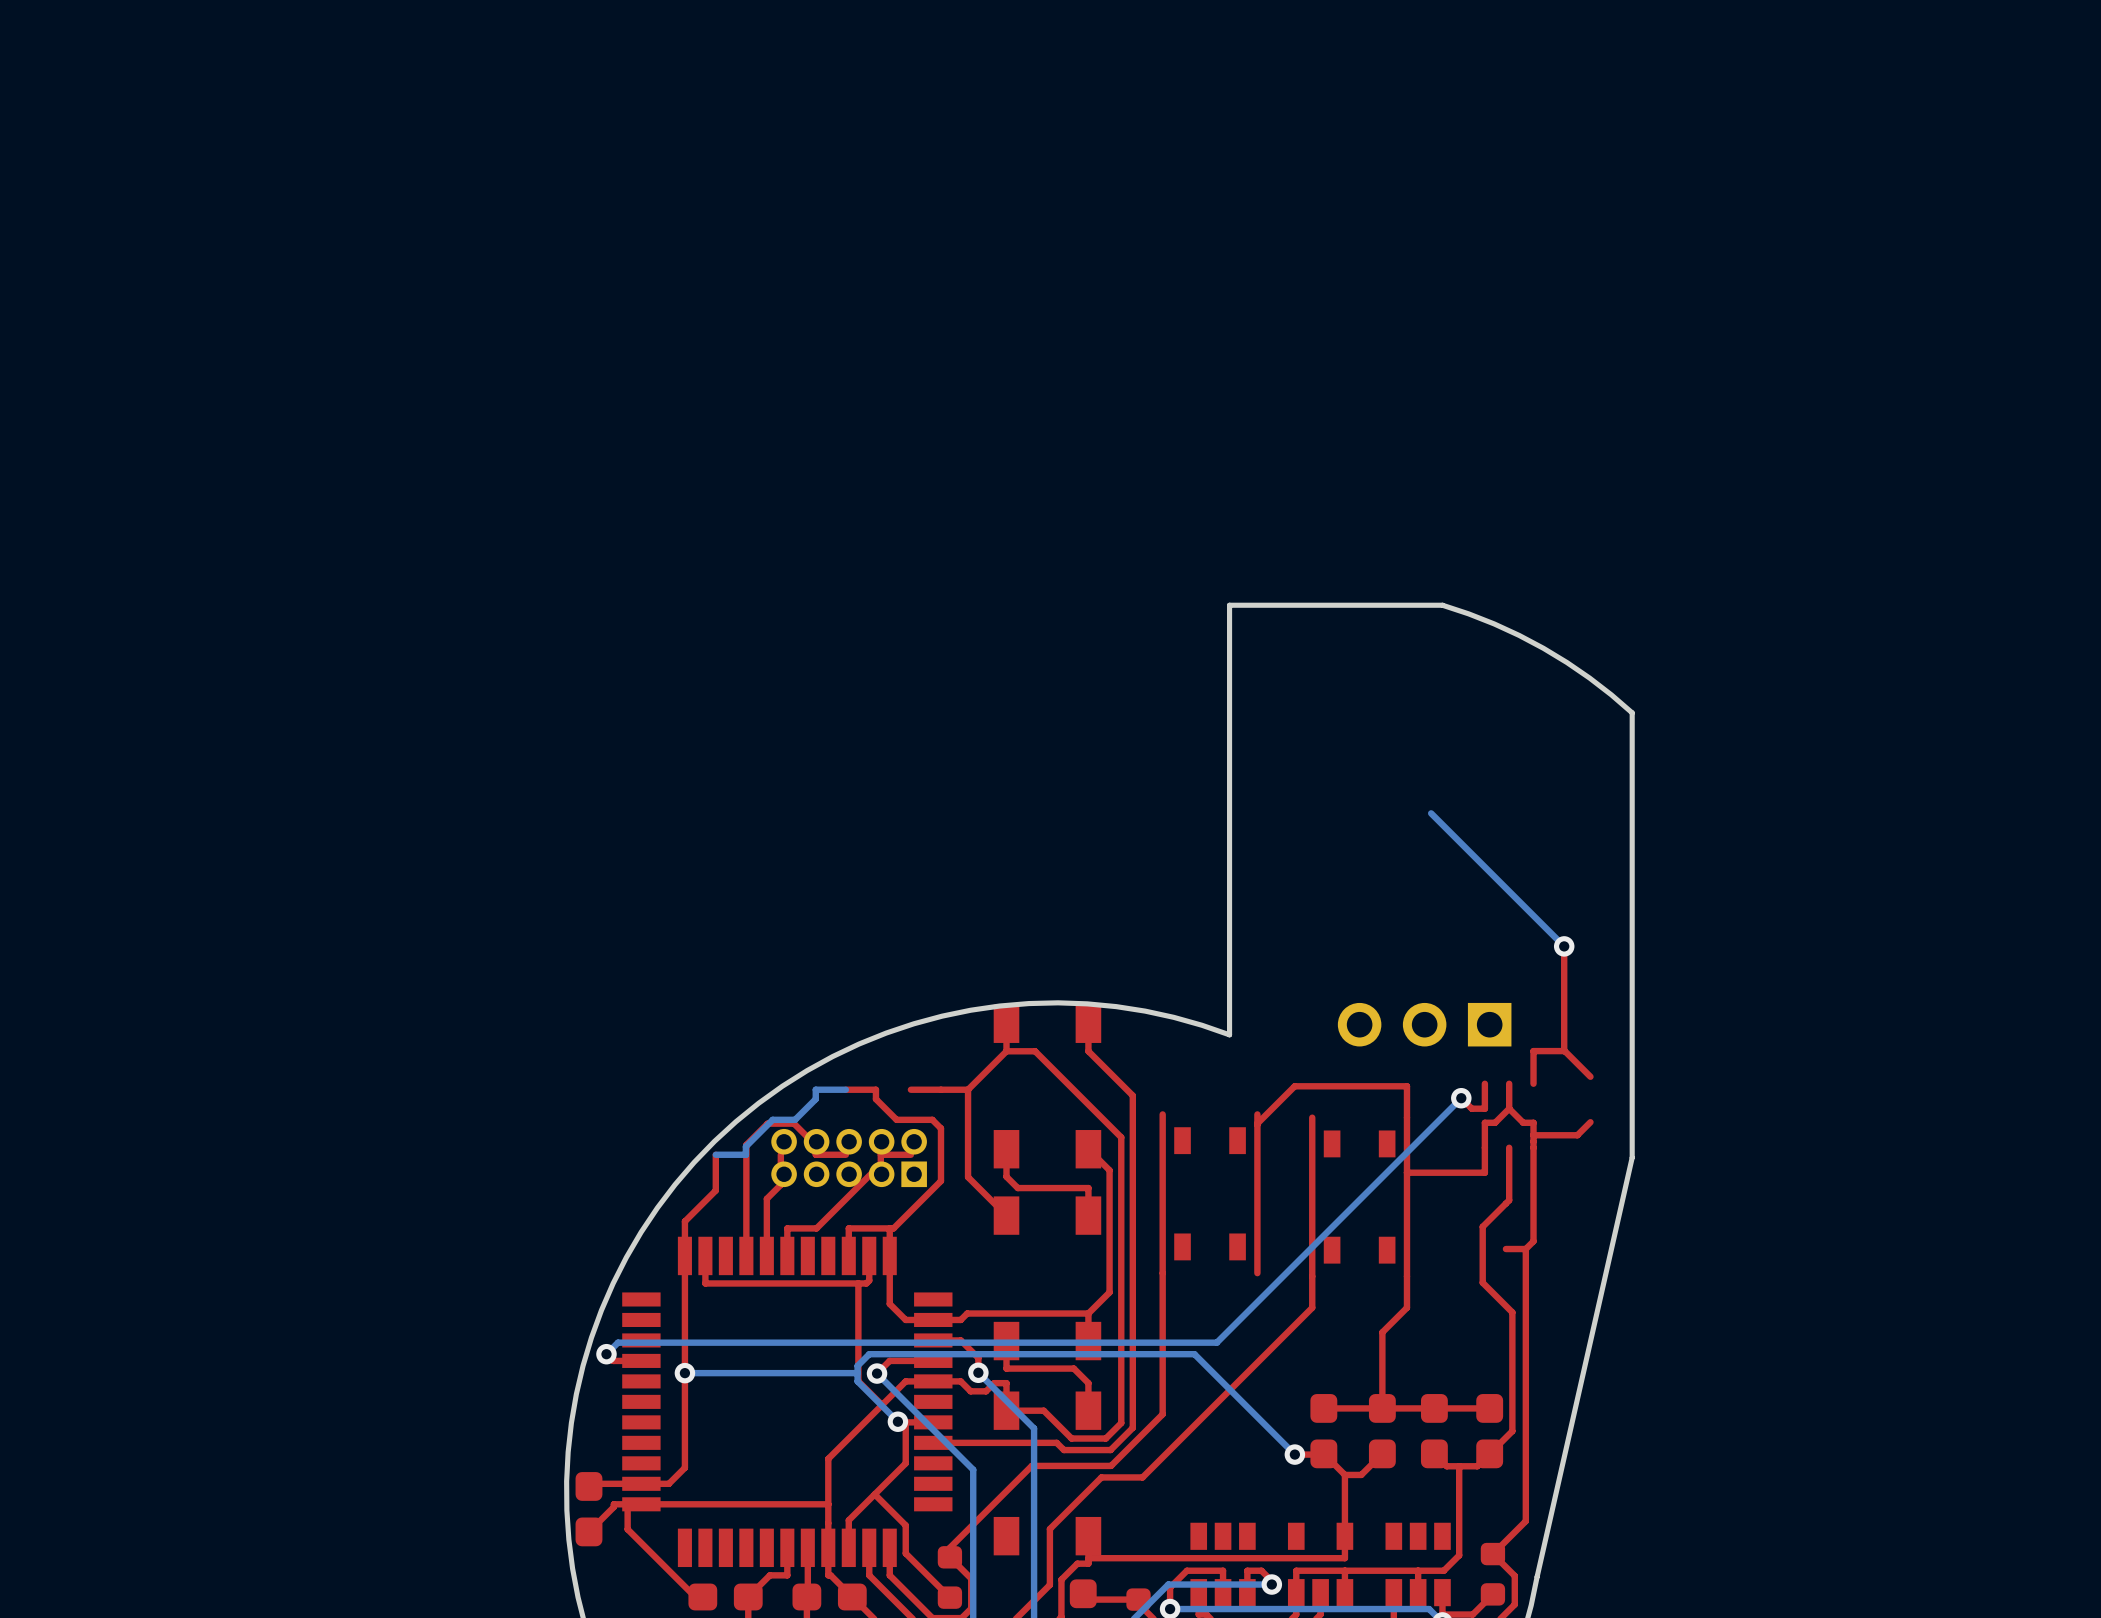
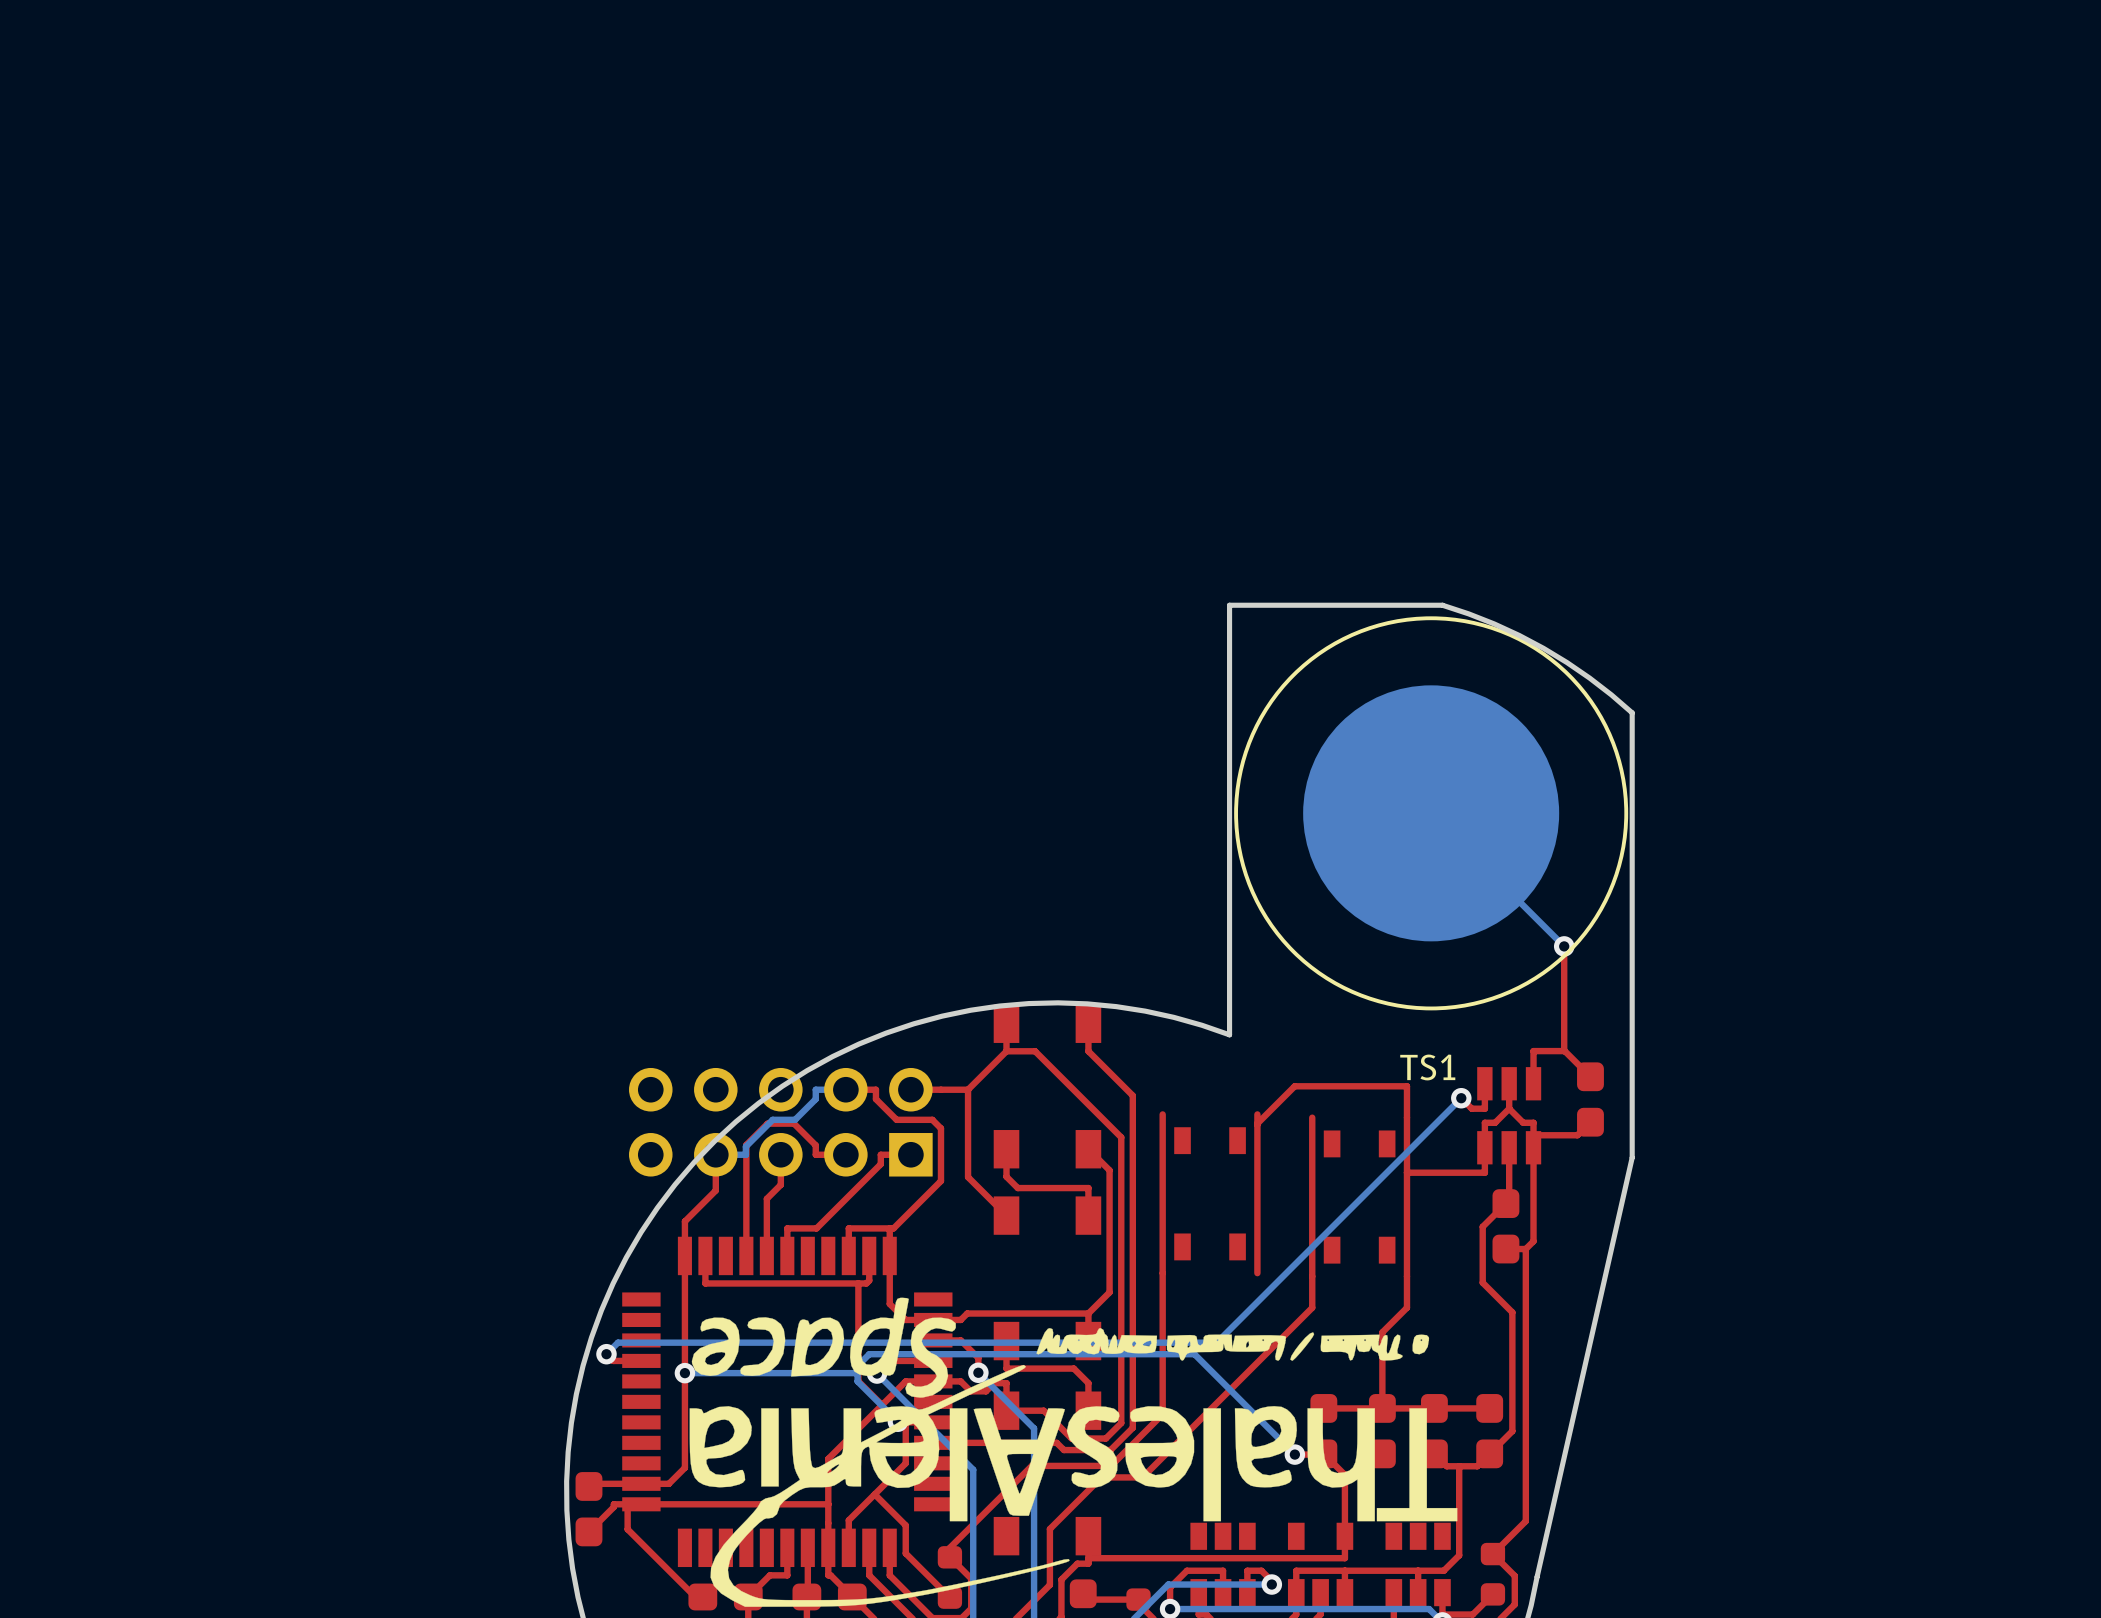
TS1: none -> (1431, 813)
part: (1424, 1024) -> none
part: none -> (1590, 1099)
part: none -> (1509, 1115)
part: none -> (780, 1122)
part: (849, 1158) -> none
part: none -> (1505, 1226)
drawing: none -> [689, 1297, 1458, 1607]

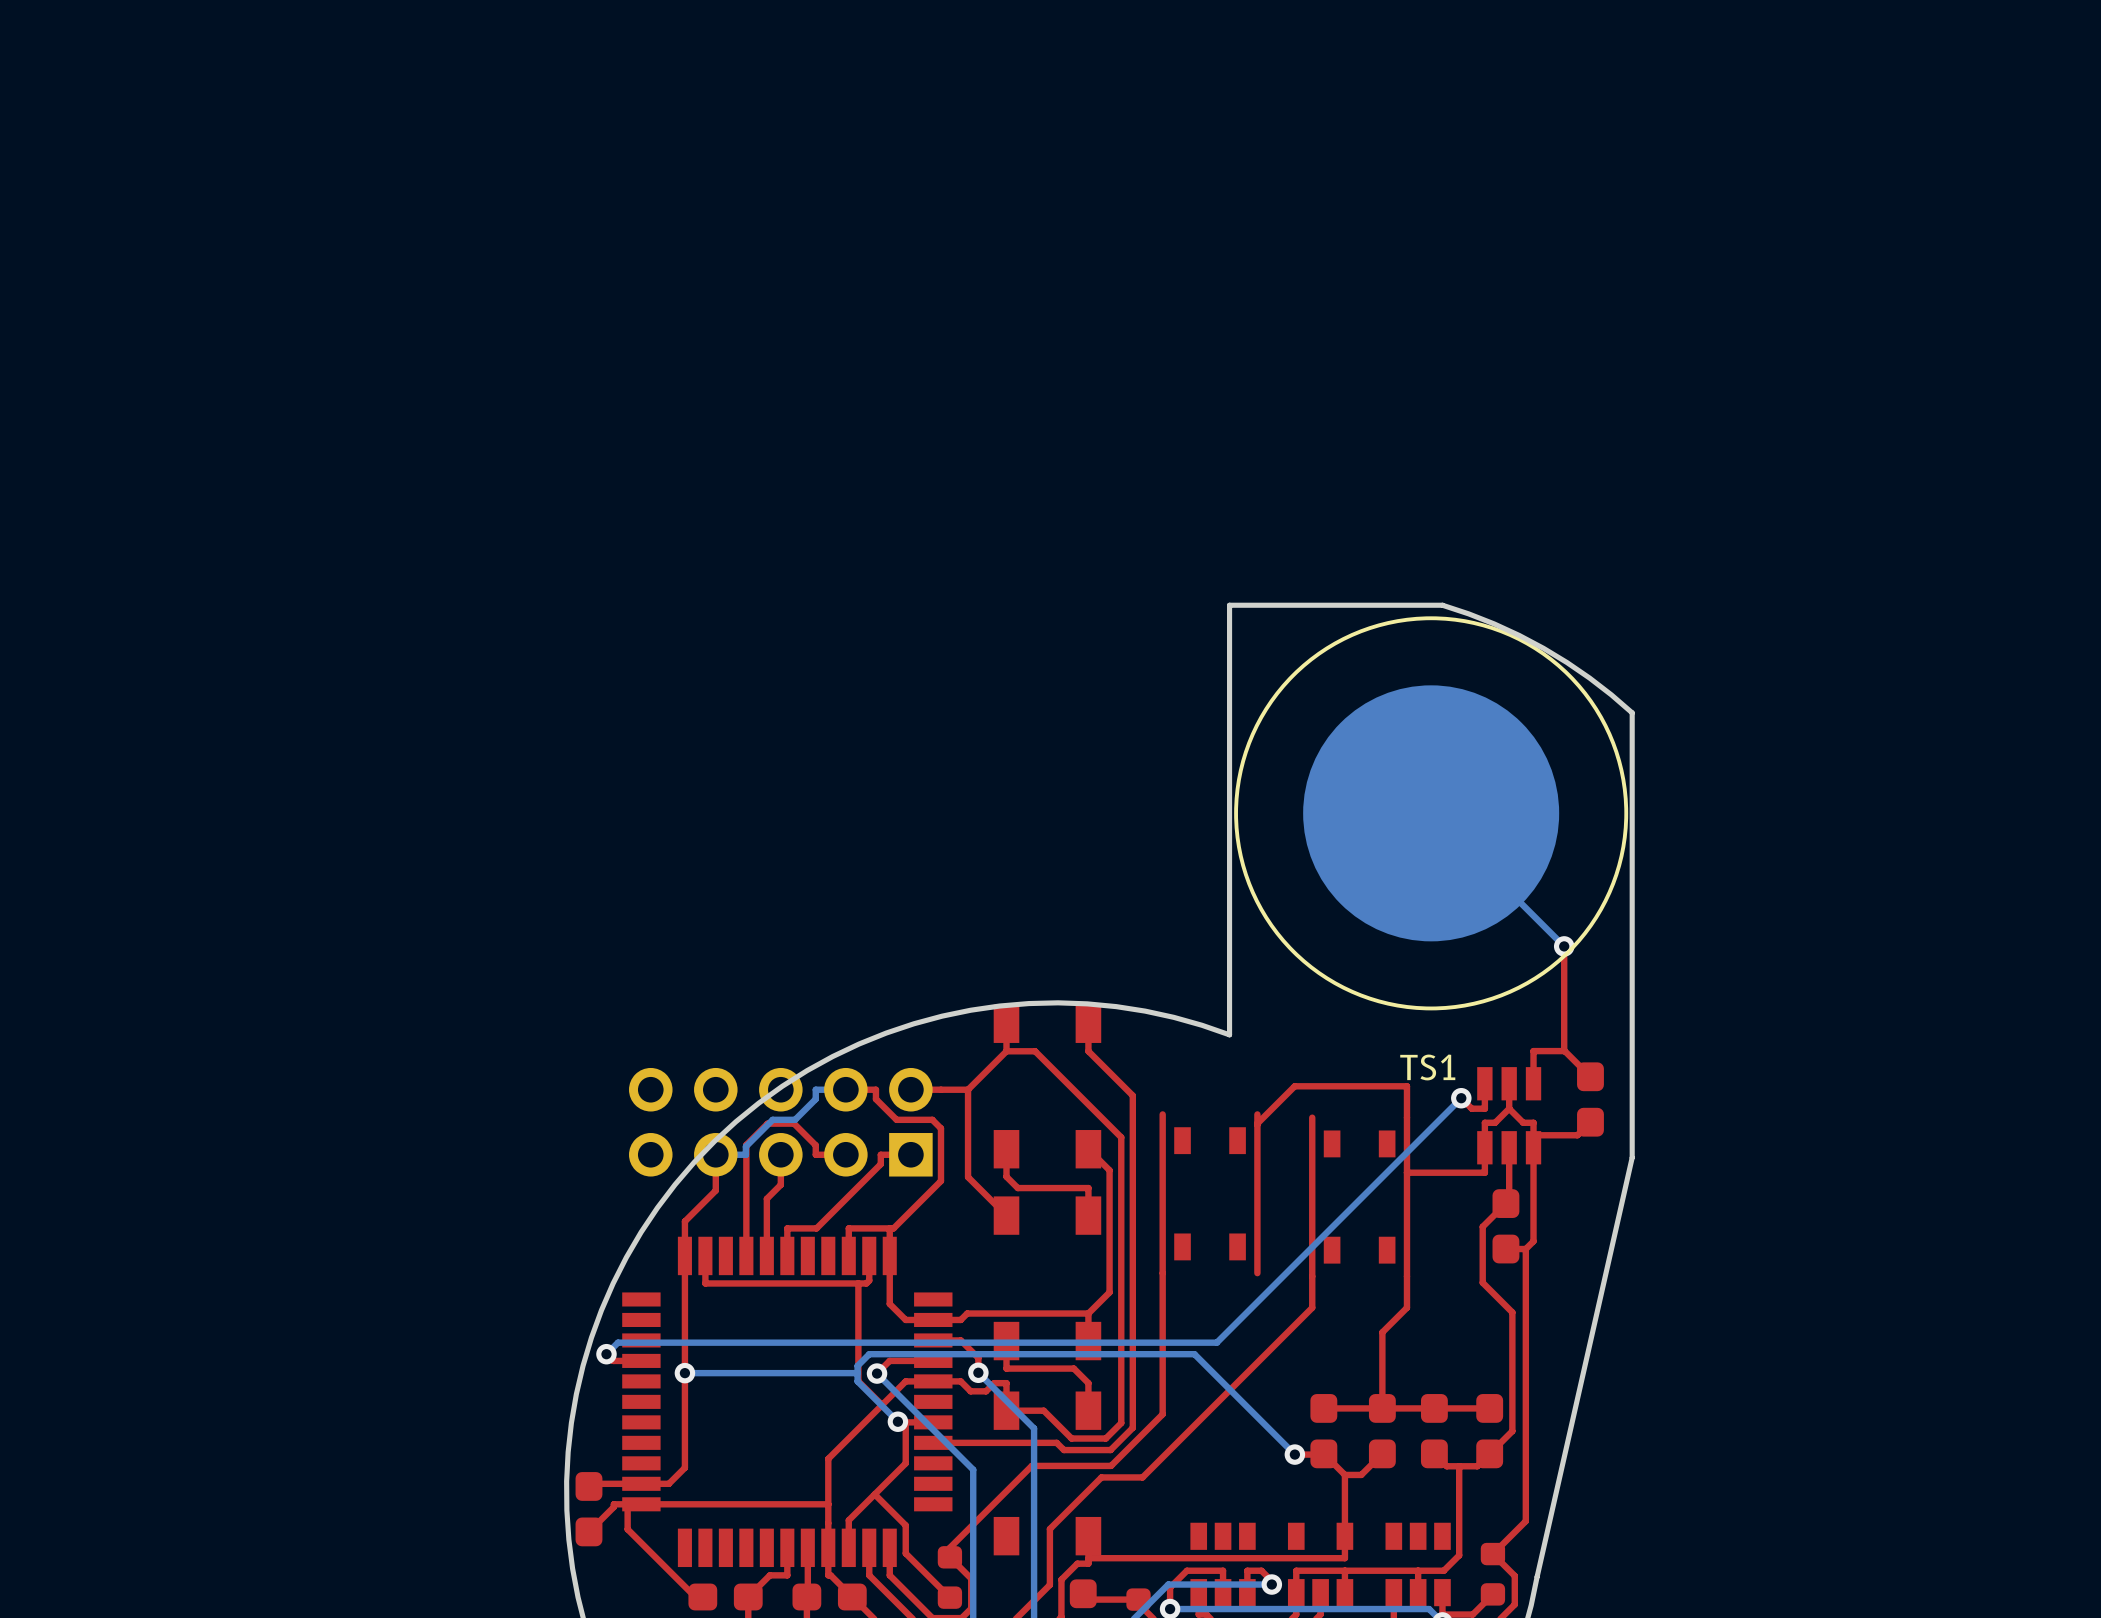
drawing: [689, 1297, 1458, 1607] -> none

